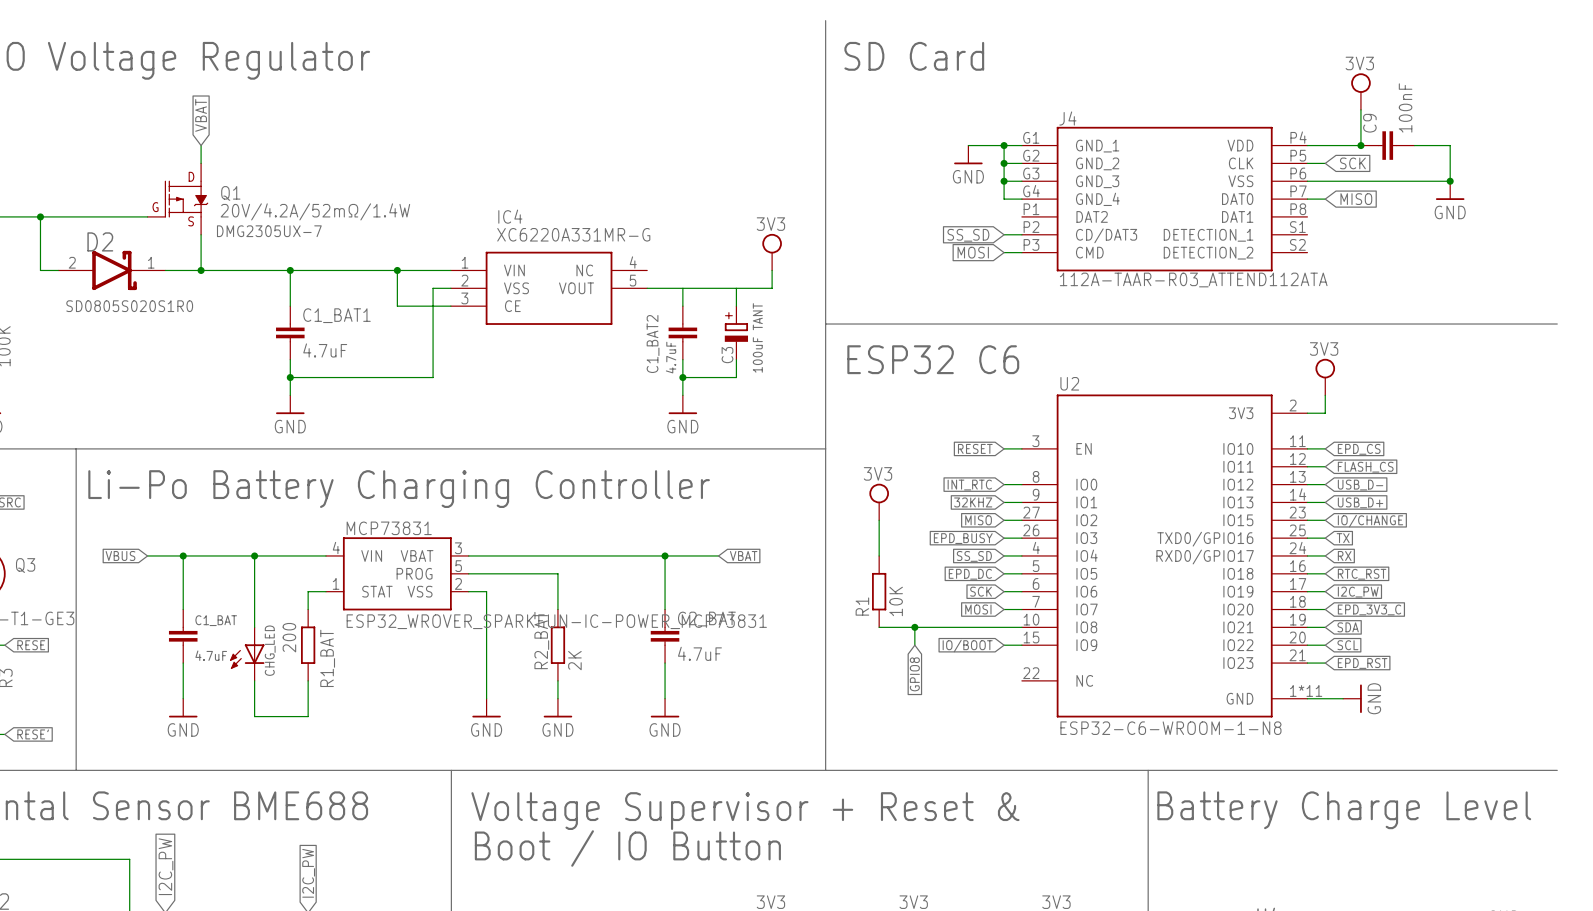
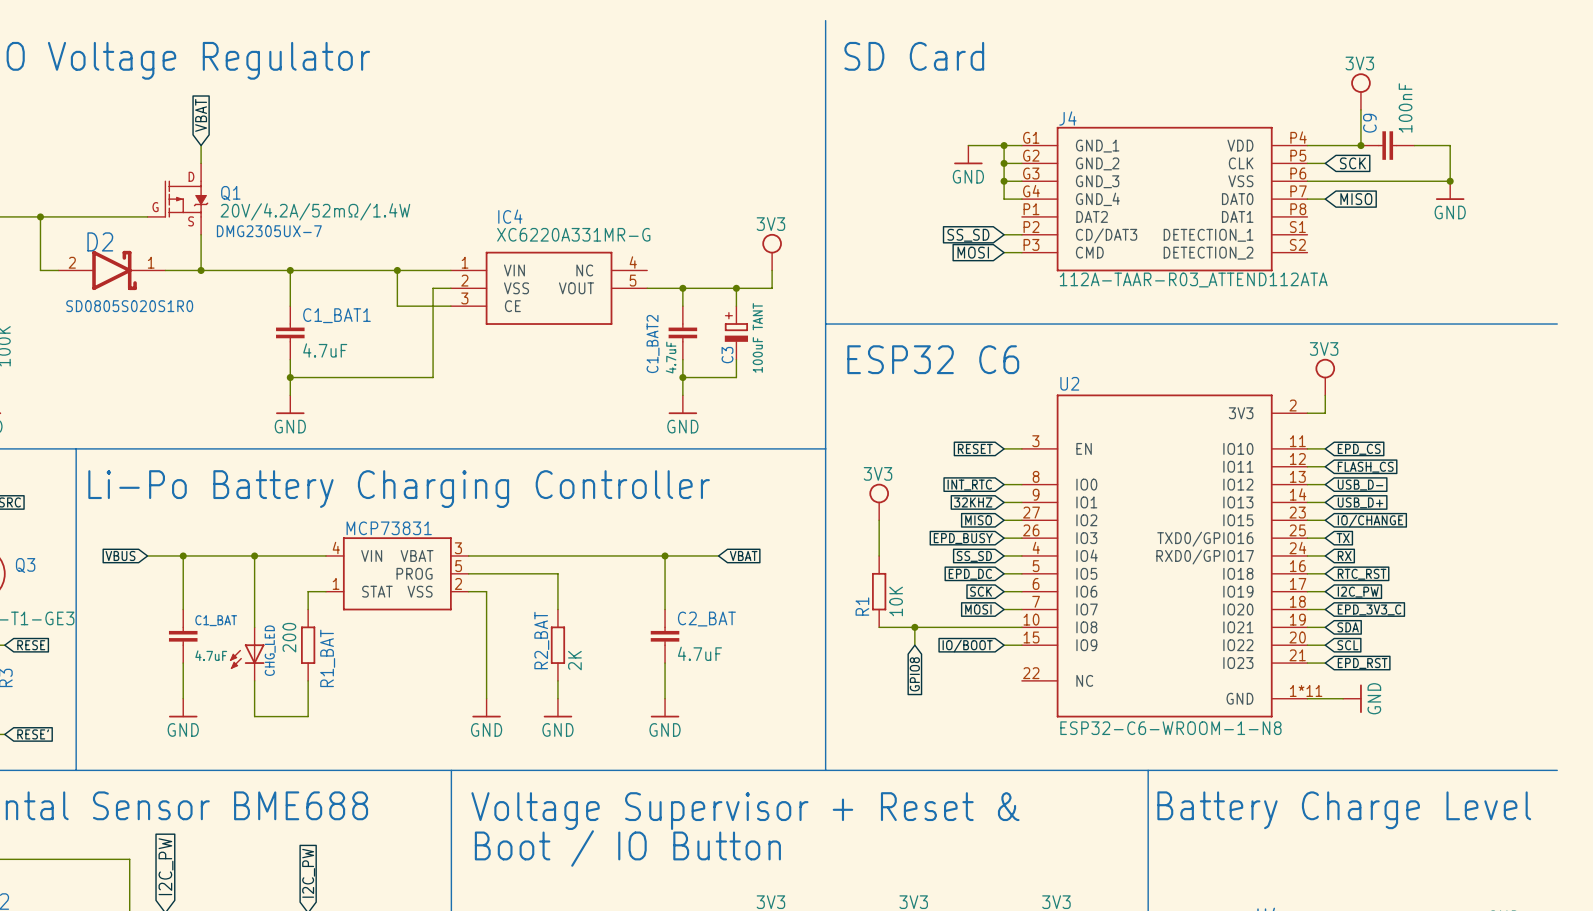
junction: none -> (682, 288)
junction: none -> (736, 288)
MCP73831 value: ESP32_WROVER_SPARKFUN-IC-POWER_MCP73831 (556, 621) -> none

